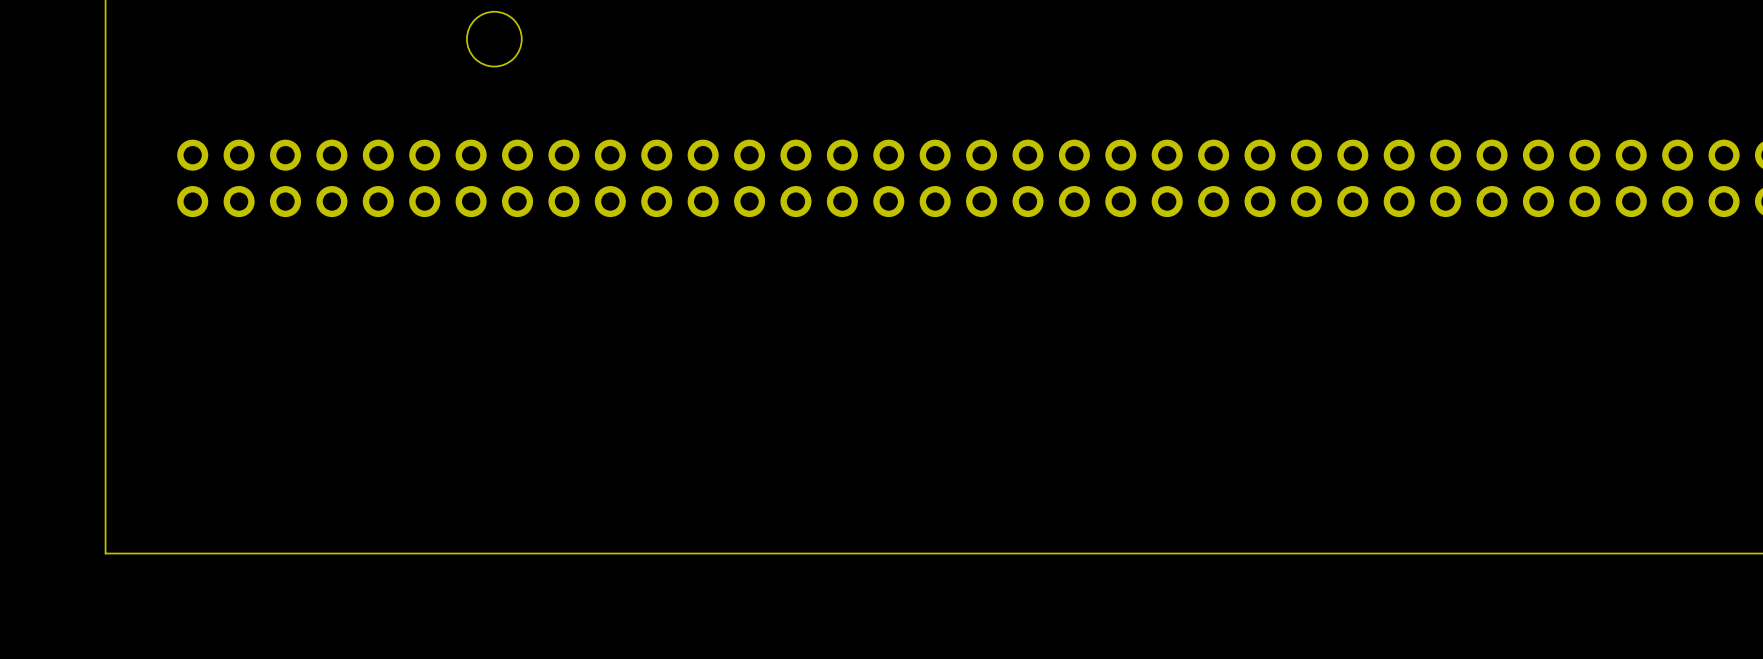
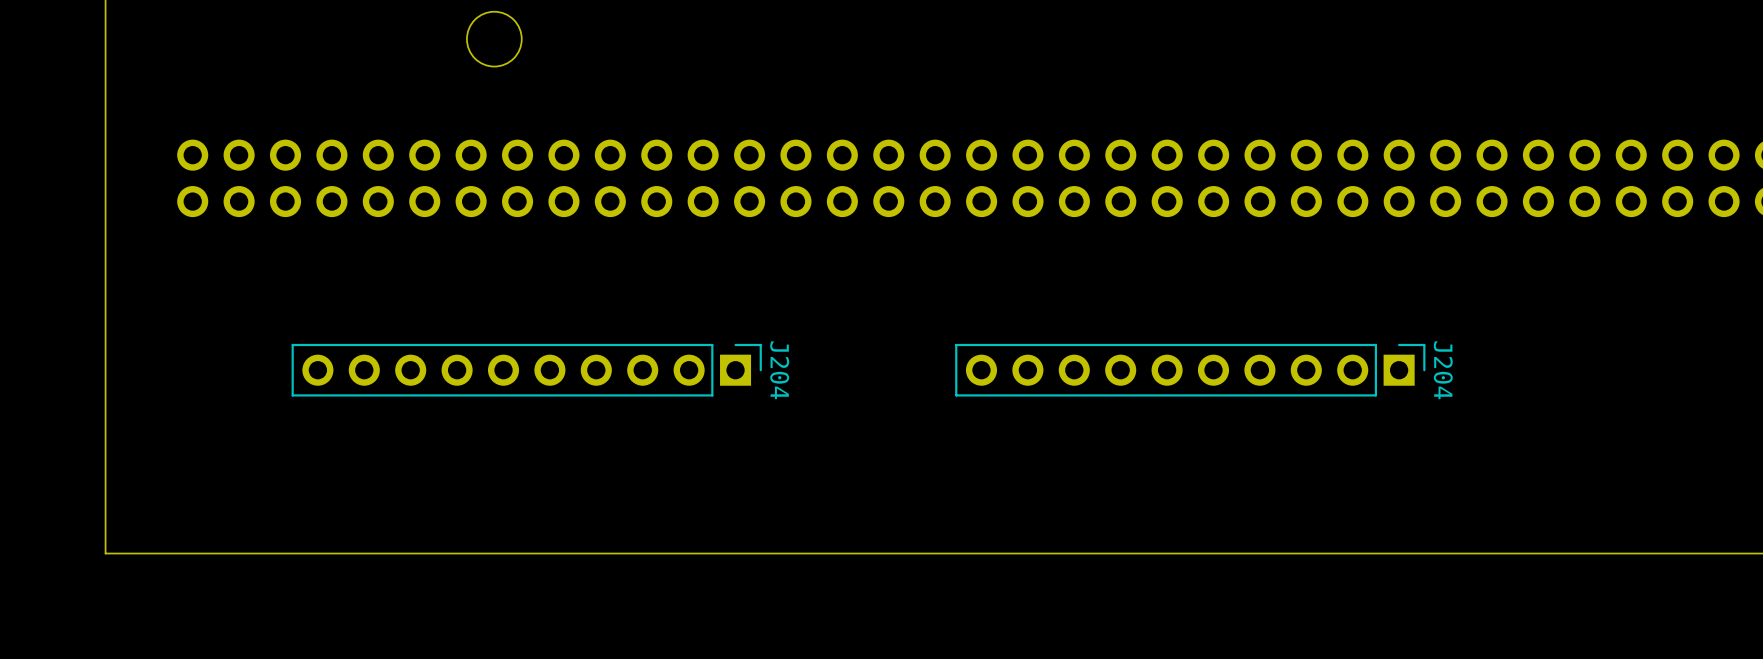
J204: none -> (526, 370)
J204: none -> (1190, 370)

